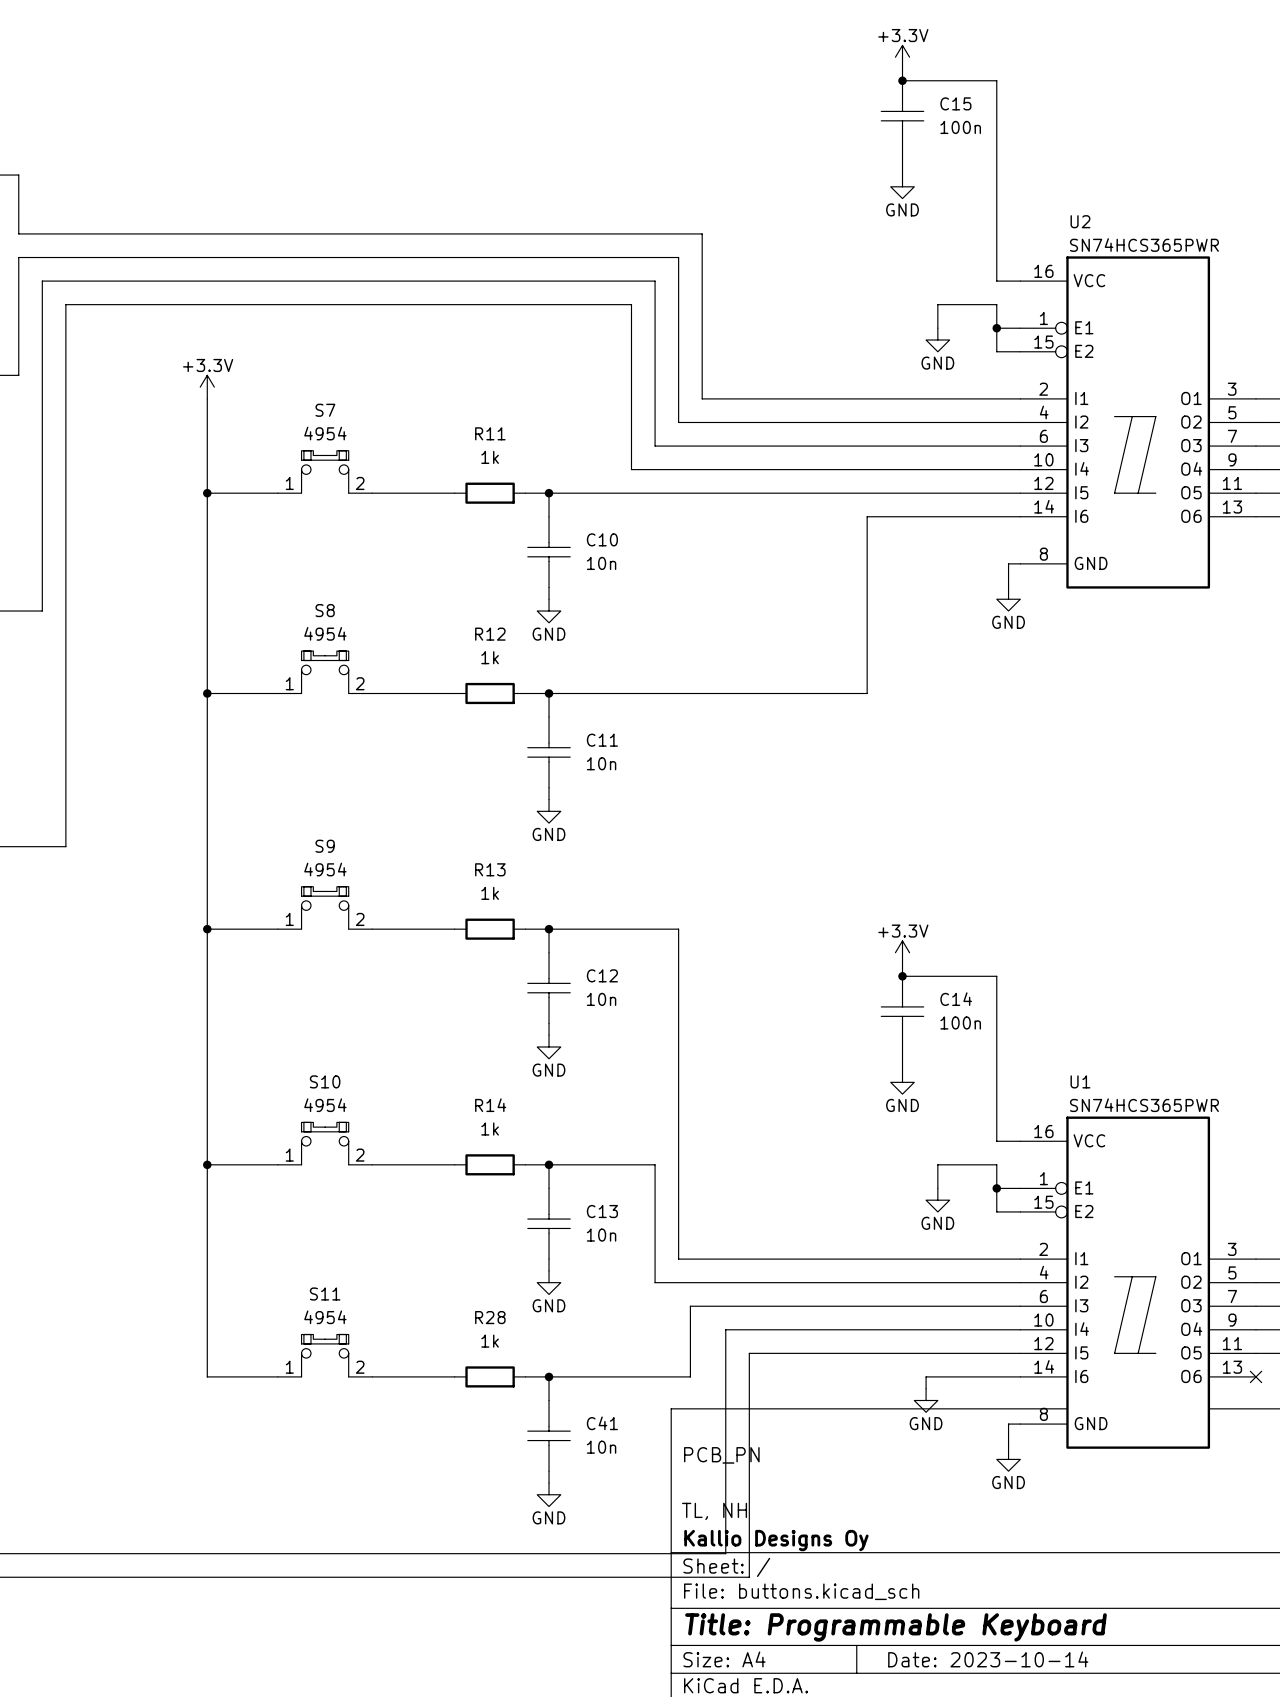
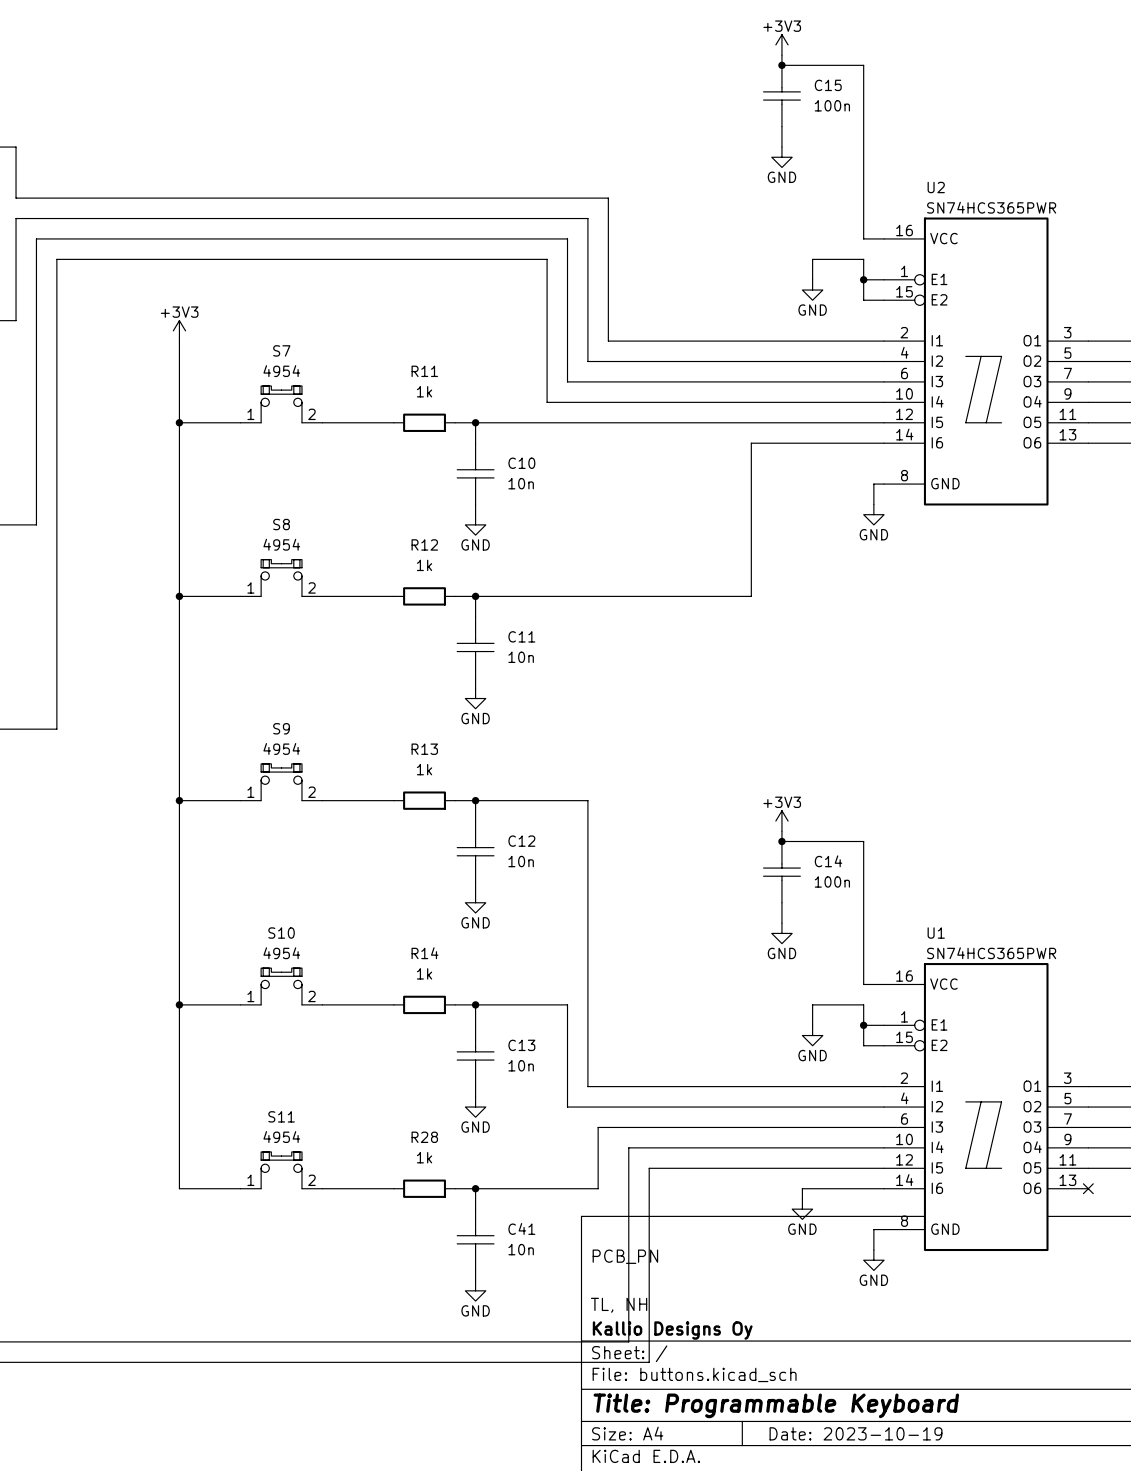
power symbol: +3.3V (902, 57) -> +3V3 (781, 44)
power symbol: +3.3V (207, 387) -> +3V3 (179, 330)
power symbol: +3.3V (902, 952) -> +3V3 (781, 821)
title block: Date: 2023-10-14 (988, 1659) -> Date: 2023-10-19 (856, 1433)

